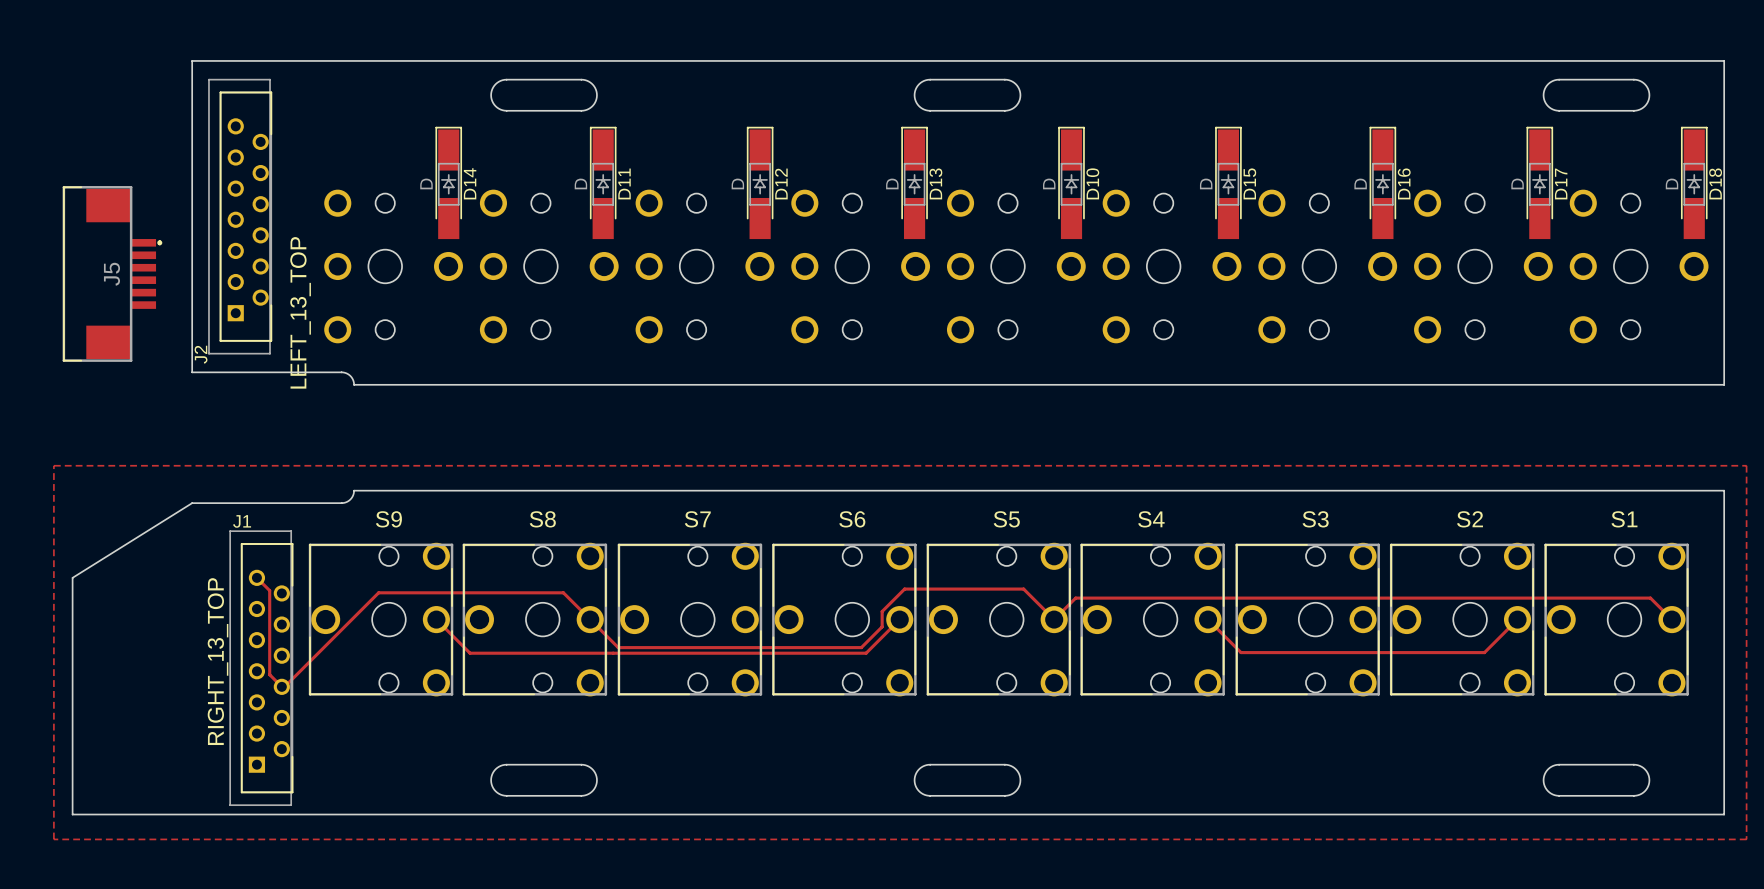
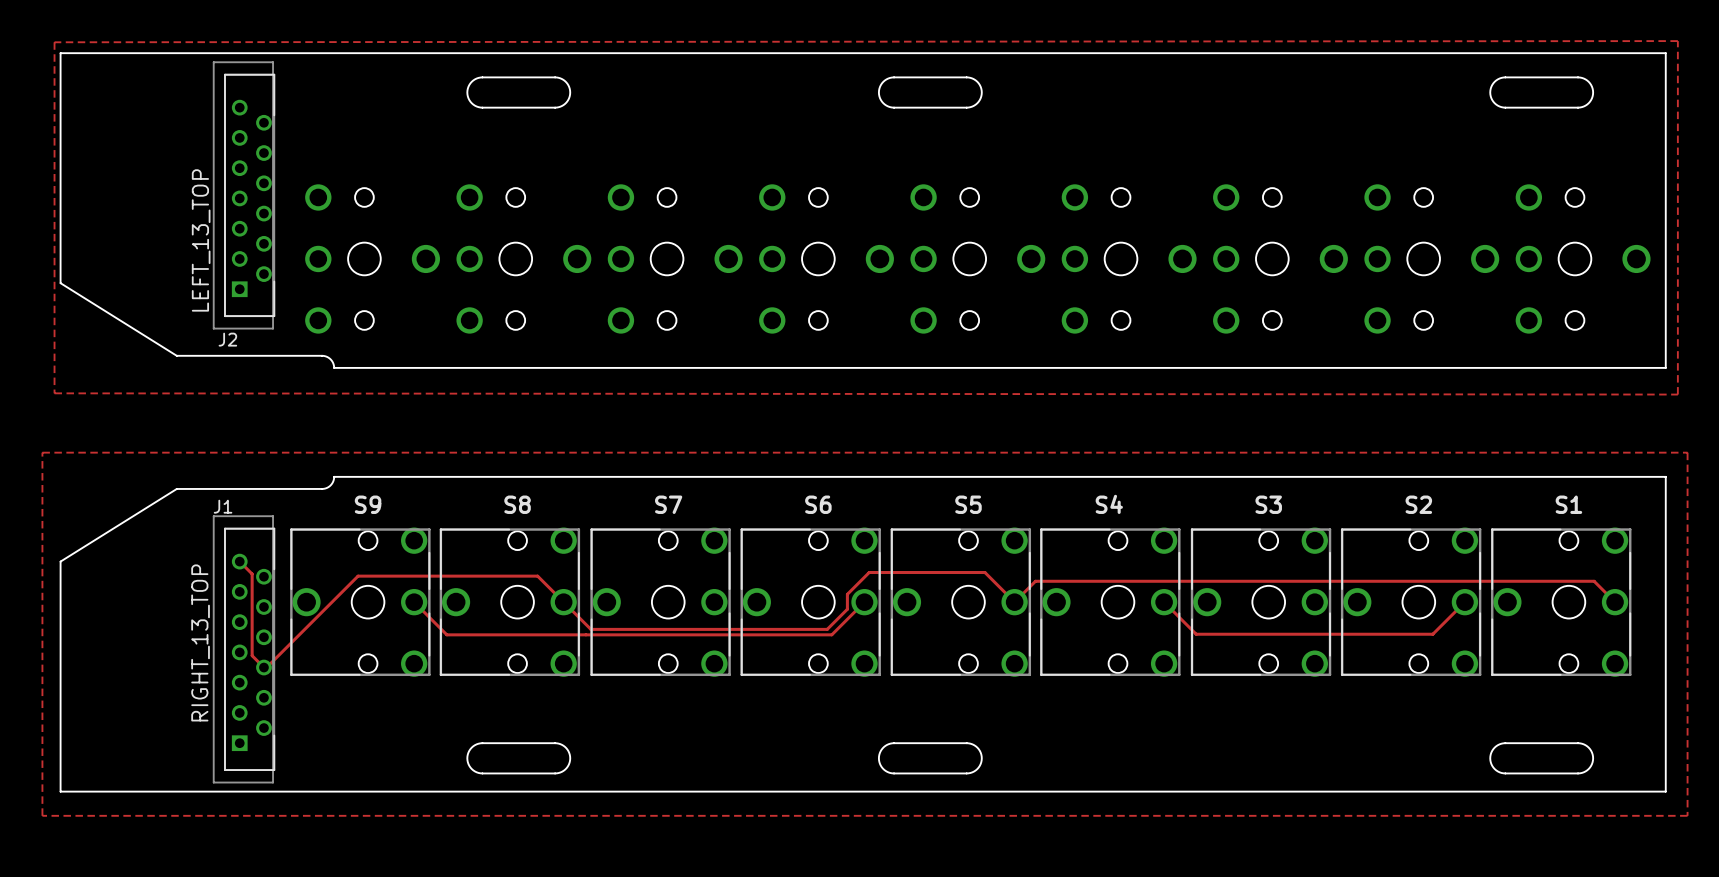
zone outline: none -> (1677, 41) (1677, 394) (54, 393) (54, 42) (1677, 41)
board edge: (1724, 60) (192, 60) (192, 372) (343, 372) (351, 377) (354, 384) (1724, 384) (1724, 378) -> (1665, 59) (1665, 53) (60, 53) (60, 283) (176, 355) (323, 355) (331, 360) (334, 367) (1665, 367)
D14: D (448, 182) -> none
D11: D (603, 182) -> none
D12: D (760, 182) -> none
D13: D (914, 182) -> none
D10: D (1071, 182) -> none
D15: D (1228, 182) -> none
D16: D (1382, 182) -> none
D17: D (1539, 182) -> none
D18: D (1694, 182) -> none
J2 position: (240, 216) -> (244, 195)
J5: (112, 273) -> none
J2 value position: LEFT_13_TOP (300, 312) -> LEFT_13_TOP (201, 240)
J2 name rotation: 0° (201, 354) -> 90° clockwise (227, 339)

